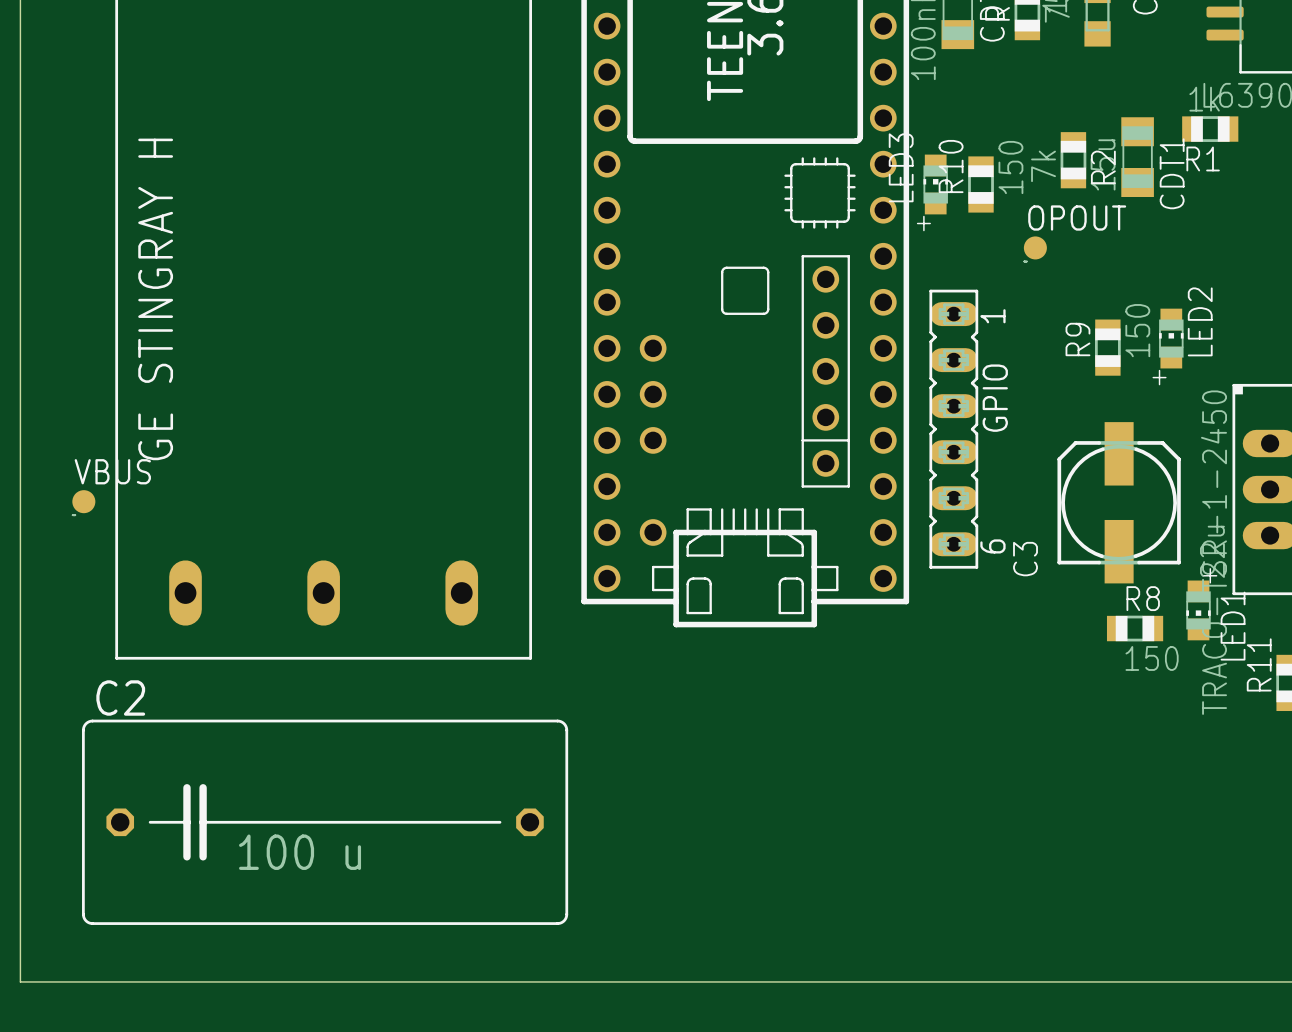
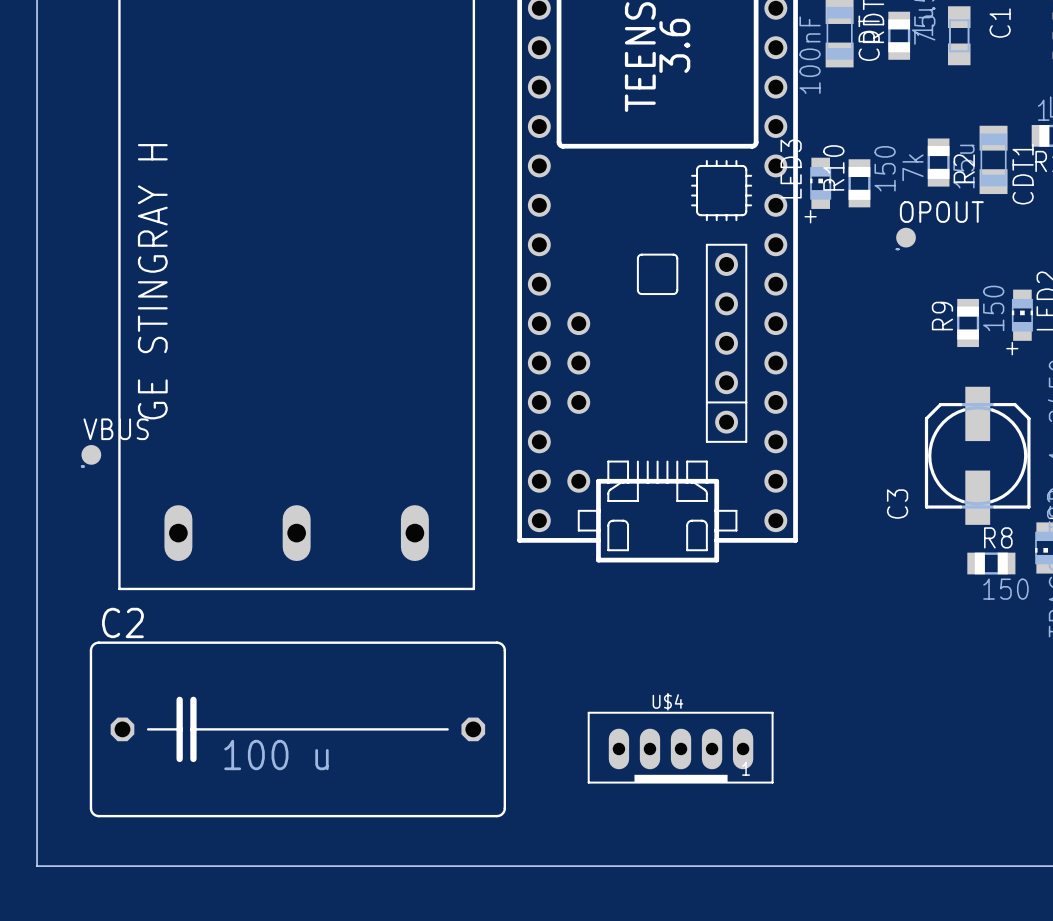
GPIO: (953, 429) -> none
U$4: none -> (680, 747)

